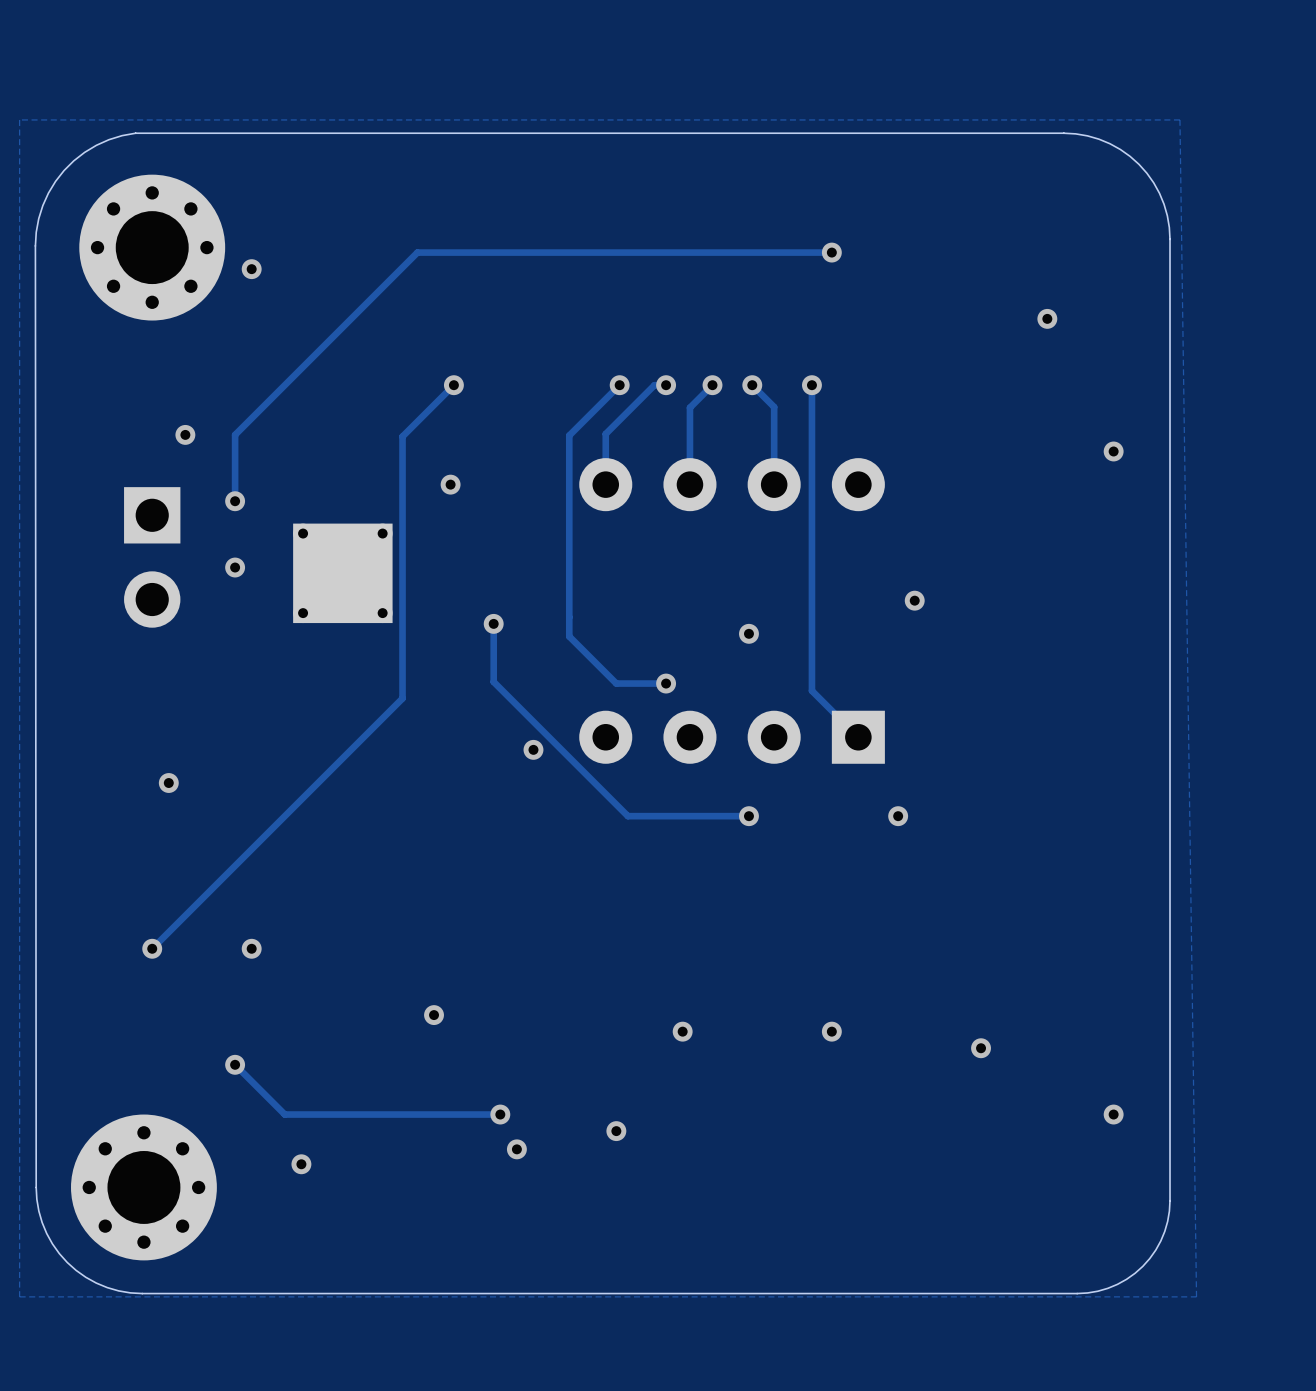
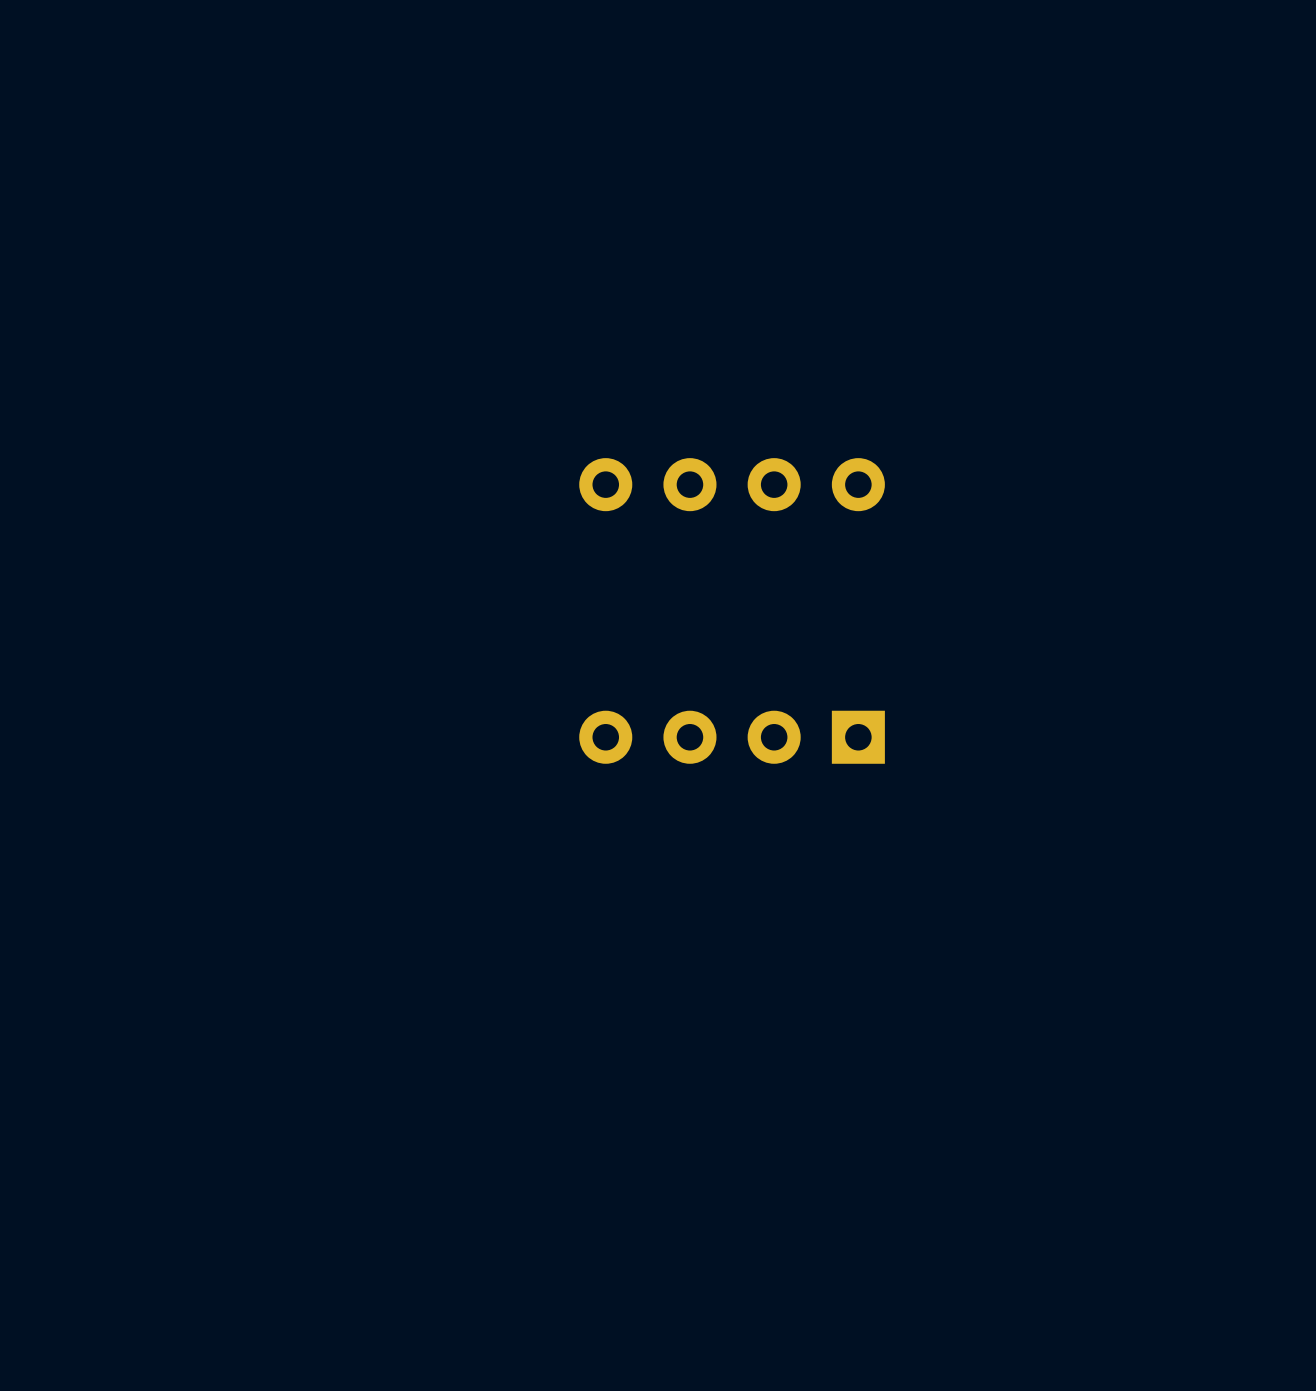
zone outline: (1179, 119) (19, 119) (19, 1296) (1196, 1296) (1179, 119) -> none
board edge: (1063, 133) (135, 133) (108, 139) (96, 145) (73, 160) (64, 170) (55, 181) (42, 205) (36, 232) (35, 245) (36, 1187) (38, 1211) (46, 1233) (59, 1253) (76, 1270) (107, 1287) (142, 1293) (1077, 1293) (1097, 1291) (1117, 1284) (1135, 1273) (1149, 1258) (1164, 1231) (1170, 1200) (1169, 227) (1164, 204) (1153, 182) (1130, 156) (1098, 139) (1063, 133) -> none
part: (152, 247) -> none
track: (831, 252) (417, 252) (235, 434) (235, 501) -> none
via: (831, 252) -> none
via: (251, 269) -> none
via: (1047, 318) -> none
track: (453, 385) (402, 436) (402, 698) (152, 948) -> none
via: (453, 385) -> none
track: (619, 385) (569, 435) (569, 636) (616, 683) (666, 683) -> none
via: (619, 385) -> none
track: (666, 385) (654, 385) (605, 433) (605, 484) -> none
via: (666, 385) -> none
track: (712, 385) (689, 407) (689, 484) -> none
via: (712, 385) -> none
track: (752, 385) (774, 407) (774, 484) -> none
via: (752, 385) -> none
track: (811, 385) (811, 690) (858, 737) -> none
via: (811, 385) -> none
via: (185, 434) -> none
via: (1113, 451) -> none
via: (450, 484) -> none
via: (235, 501) -> none
part: (152, 557) -> none
via: (235, 567) -> none
part: (342, 573) -> none
via: (914, 600) -> none
track: (493, 623) (493, 681) (627, 816) (748, 816) -> none
via: (493, 623) -> none
via: (748, 633) -> none
via: (666, 683) -> none
via: (533, 749) -> none
via: (168, 783) -> none
via: (748, 816) -> none
via: (898, 816) -> none
via: (152, 948) -> none
via: (251, 948) -> none
via: (434, 1015) -> none
via: (682, 1031) -> none
via: (831, 1031) -> none
via: (981, 1048) -> none
track: (235, 1064) (284, 1114) (500, 1114) -> none
via: (235, 1064) -> none
via: (500, 1114) -> none
via: (1113, 1114) -> none
via: (616, 1131) -> none
via: (516, 1149) -> none
via: (301, 1164) -> none
part: (143, 1187) -> none

